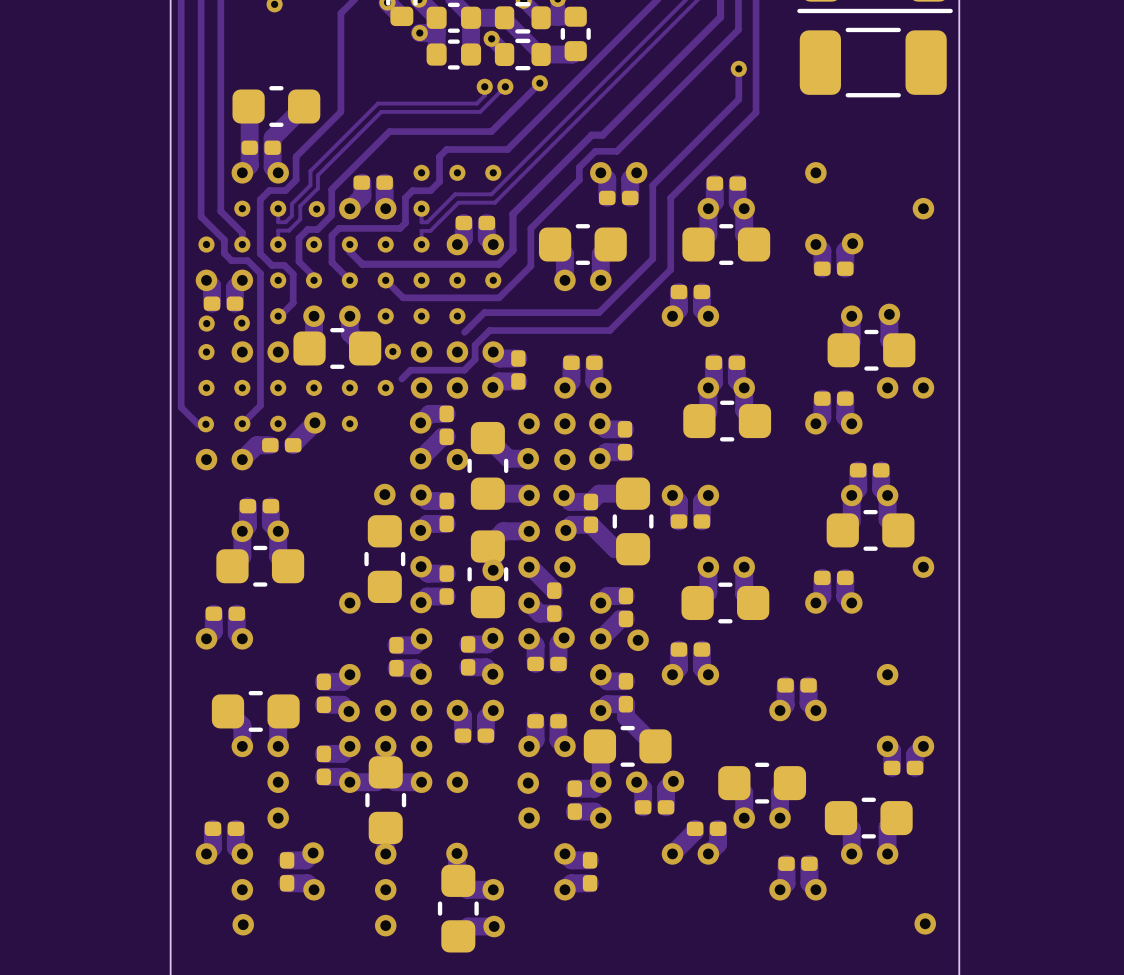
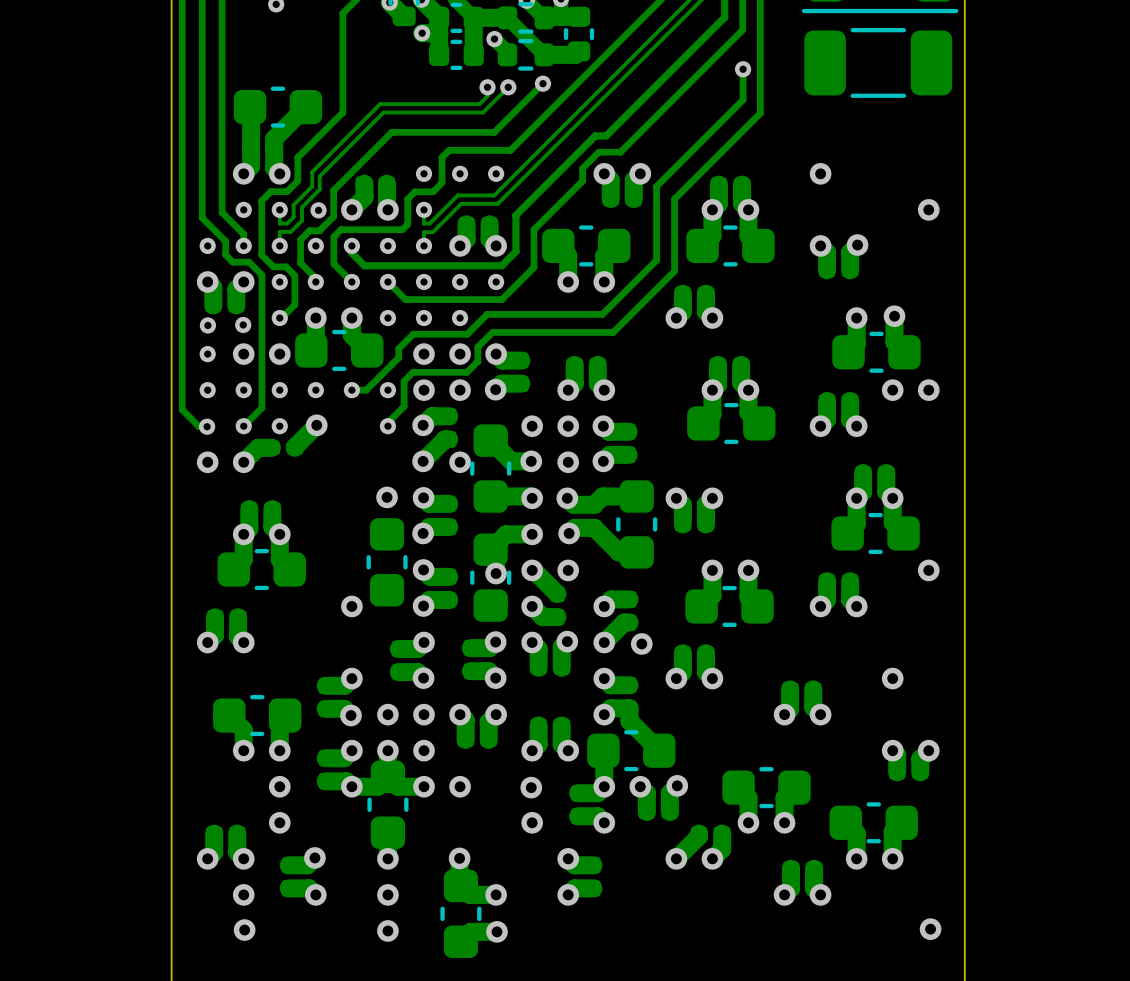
track: none -> (467, 334) (413, 334) (398, 348) (398, 357) (366, 390) (351, 390)
via: (392, 351) -> none
track: none -> (404, 381) (404, 406) (387, 422) (387, 426)
via position: (349, 423) -> (387, 426)

